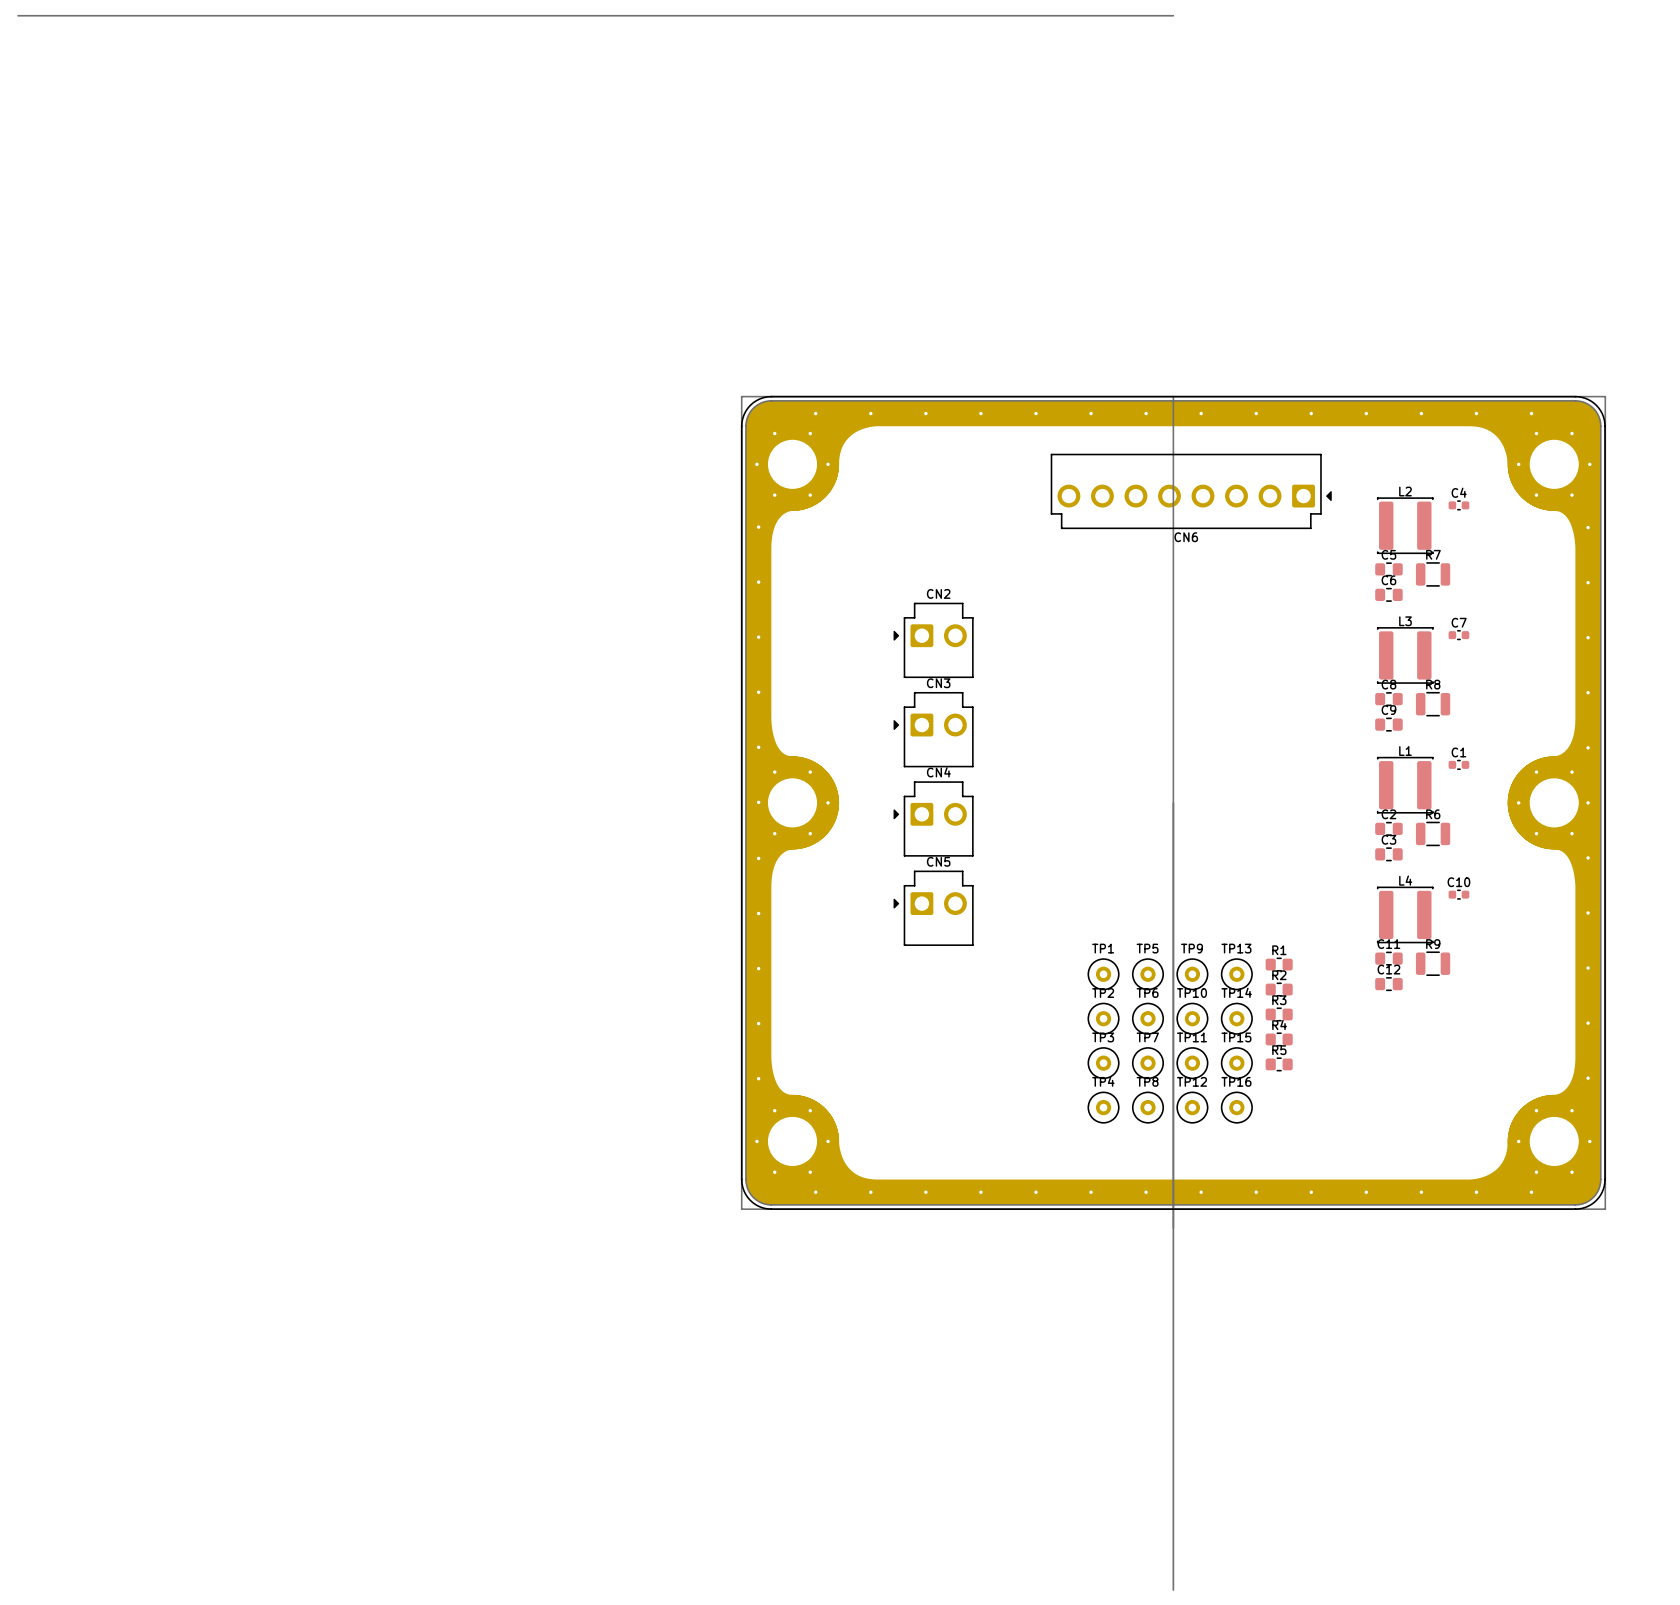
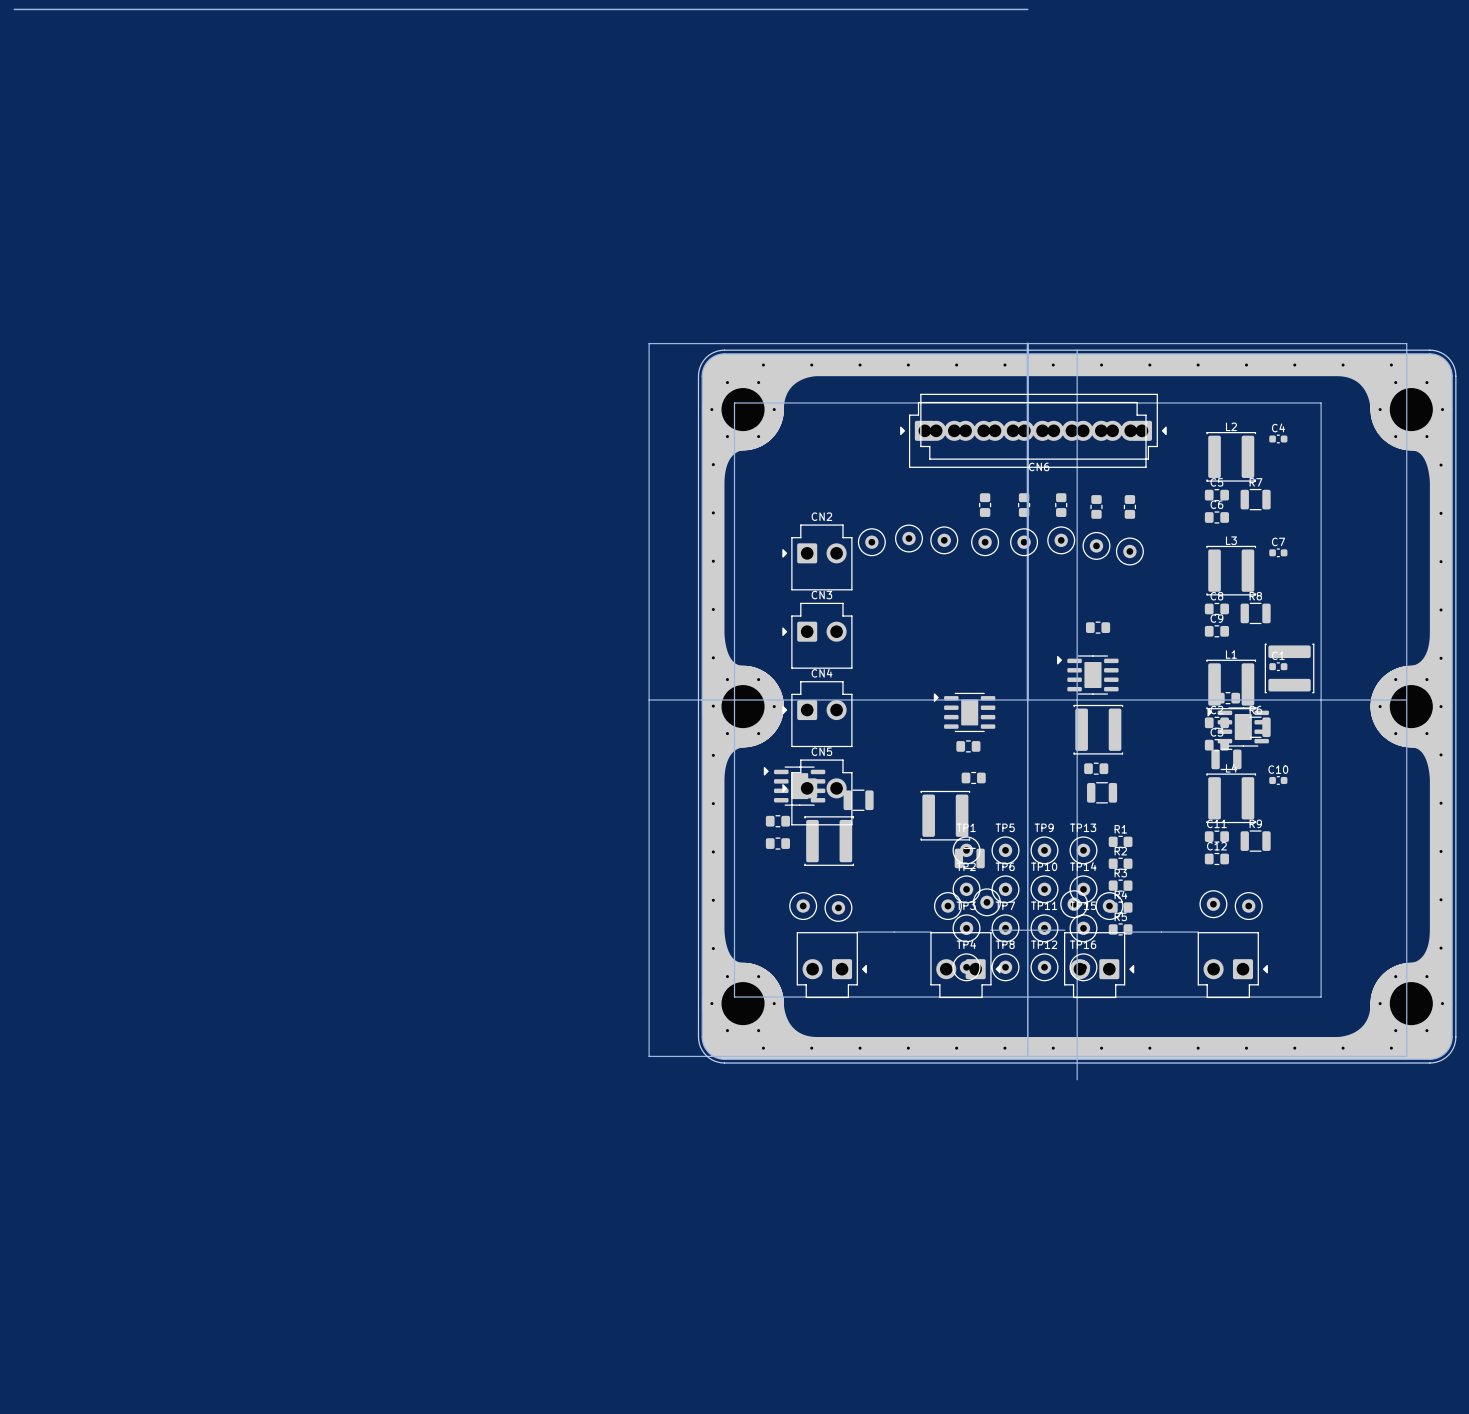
line: none -> (1027, 343) (1027, 700)
line: none -> (734, 402) (1321, 402) (1321, 997) (734, 997) (734, 402)
part: none -> (1023, 434)
part: none -> (985, 505)
part: none -> (1024, 505)
part: none -> (1061, 505)
part: none -> (1096, 506)
part: none -> (1129, 506)
part: none -> (908, 538)
part: none -> (944, 540)
part: none -> (1061, 540)
part: none -> (871, 542)
part: none -> (985, 542)
part: none -> (1024, 542)
part: none -> (1096, 545)
part: none -> (1129, 551)
part: none -> (1098, 627)
part: none -> (1289, 668)
part: none -> (1087, 675)
part: none -> (1228, 698)
line: none -> (649, 700) (1406, 700)
part position: (1173, 812) -> (1077, 714)
part: none -> (964, 712)
part: none -> (1238, 726)
part: none -> (1098, 729)
part: none -> (968, 746)
part: none -> (1226, 759)
part: none -> (1096, 768)
part: none -> (973, 777)
part: none -> (794, 786)
part: none -> (1102, 792)
part: none -> (858, 800)
part: none -> (945, 815)
part: none -> (777, 821)
part: none -> (829, 841)
part: none -> (777, 843)
part: none -> (969, 858)
part: none -> (986, 902)
part: none -> (1074, 904)
part: none -> (1213, 904)
part: none -> (803, 906)
part: none -> (947, 906)
part: none -> (1109, 906)
part: none -> (1248, 906)
part: none -> (838, 907)
line: none -> (990, 930) (1064, 930)
line: none -> (857, 932) (931, 932)
line: none -> (1124, 932) (1198, 932)
part: none -> (831, 965)
part: none -> (965, 965)
part: none -> (1099, 965)
part: none -> (1232, 965)
line: (1173, 1209) (1173, 1590) -> none

